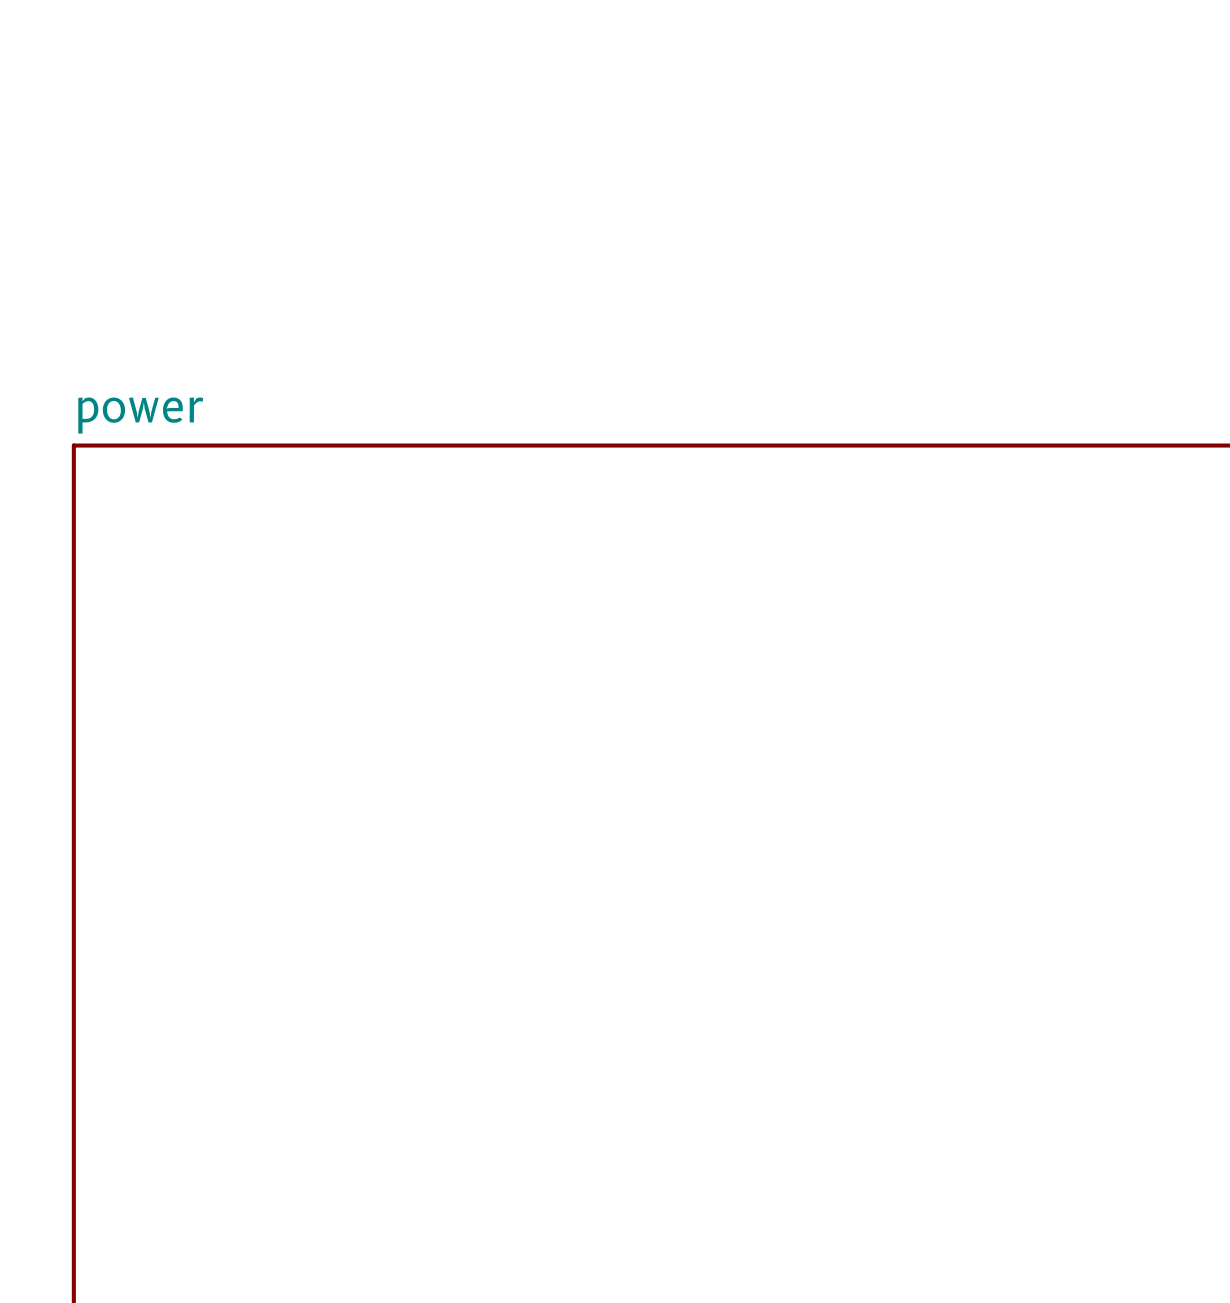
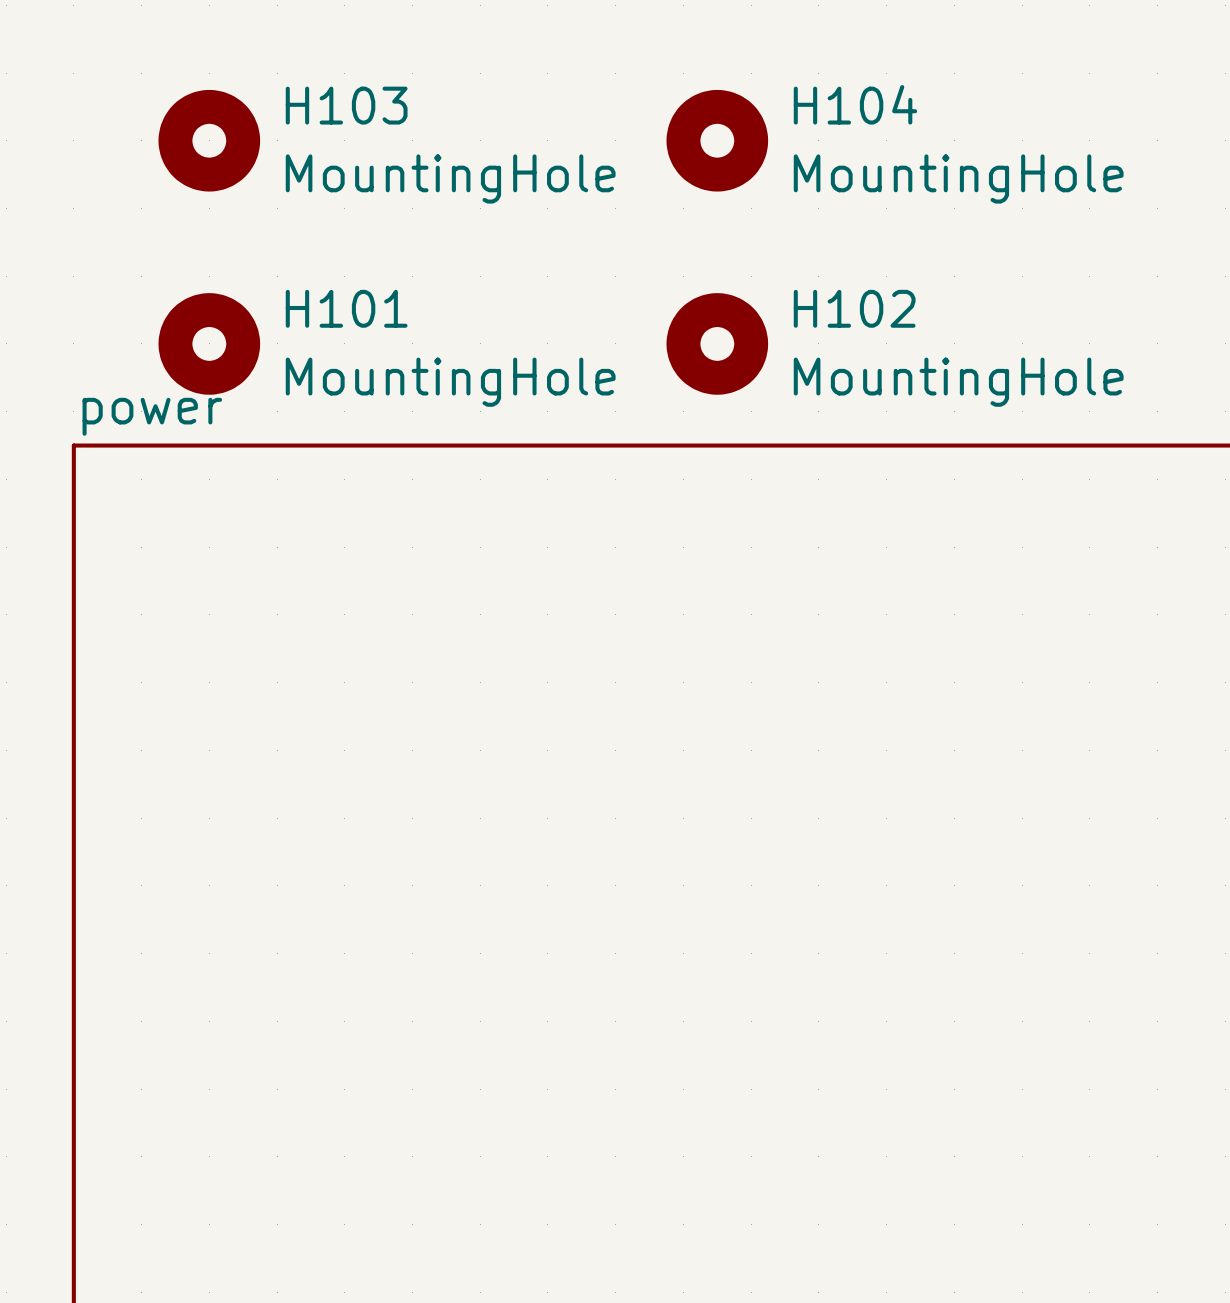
H103: none -> MountingHole (209, 140)
H104: none -> MountingHole (717, 140)
H101: none -> MountingHole (209, 343)
H102: none -> MountingHole (717, 343)

